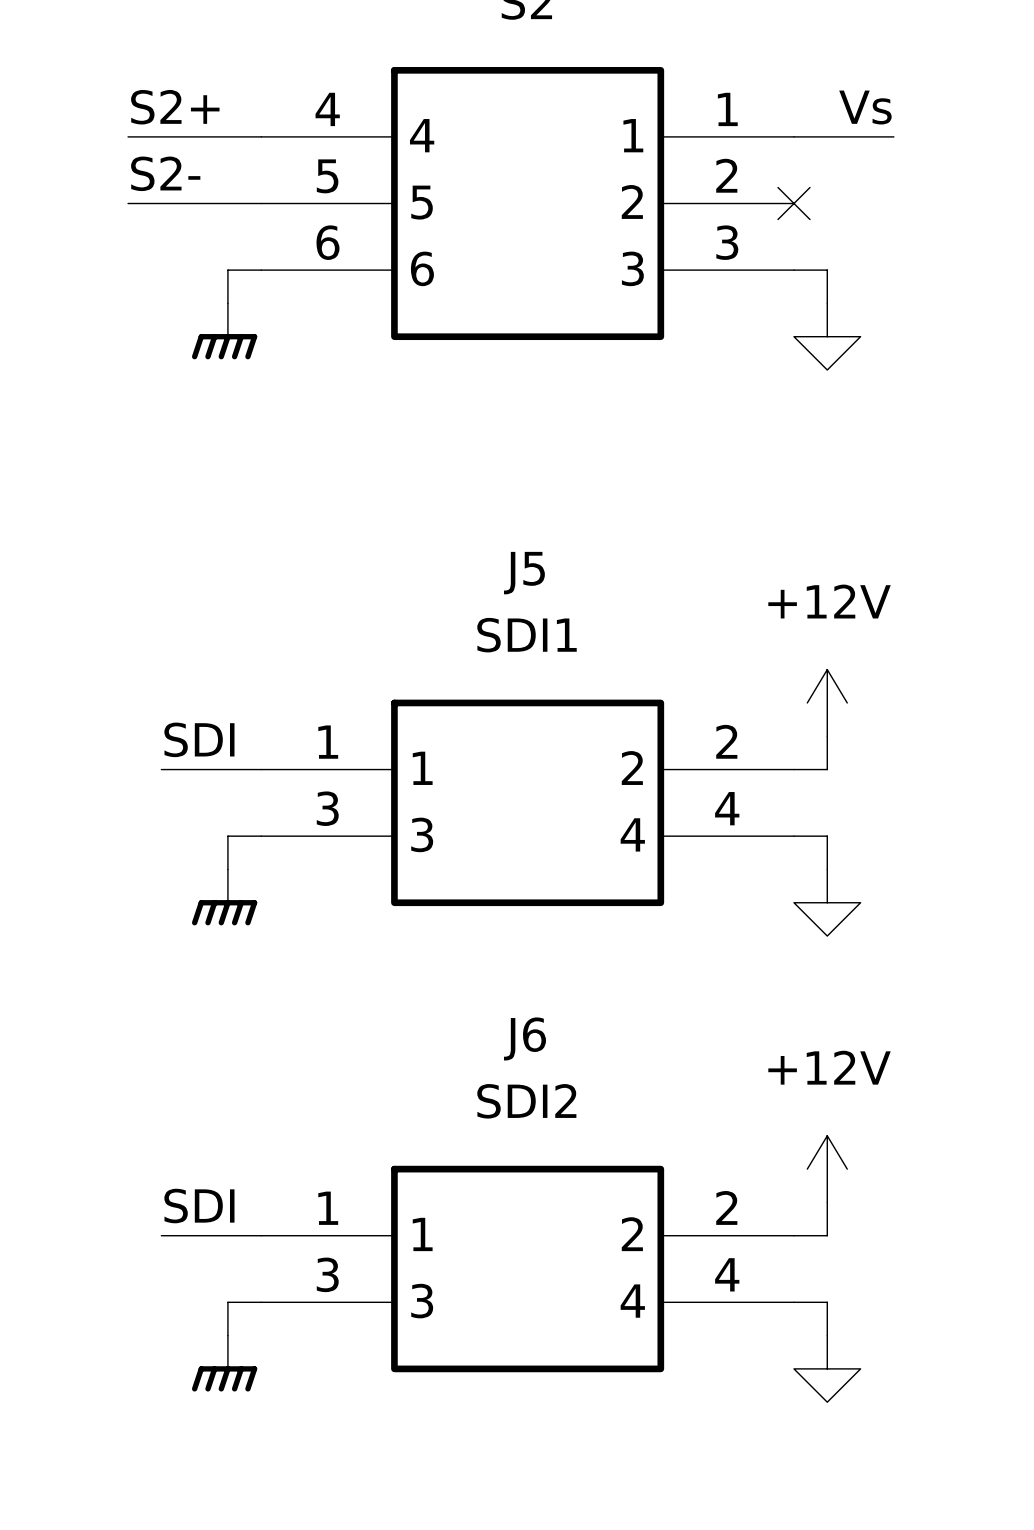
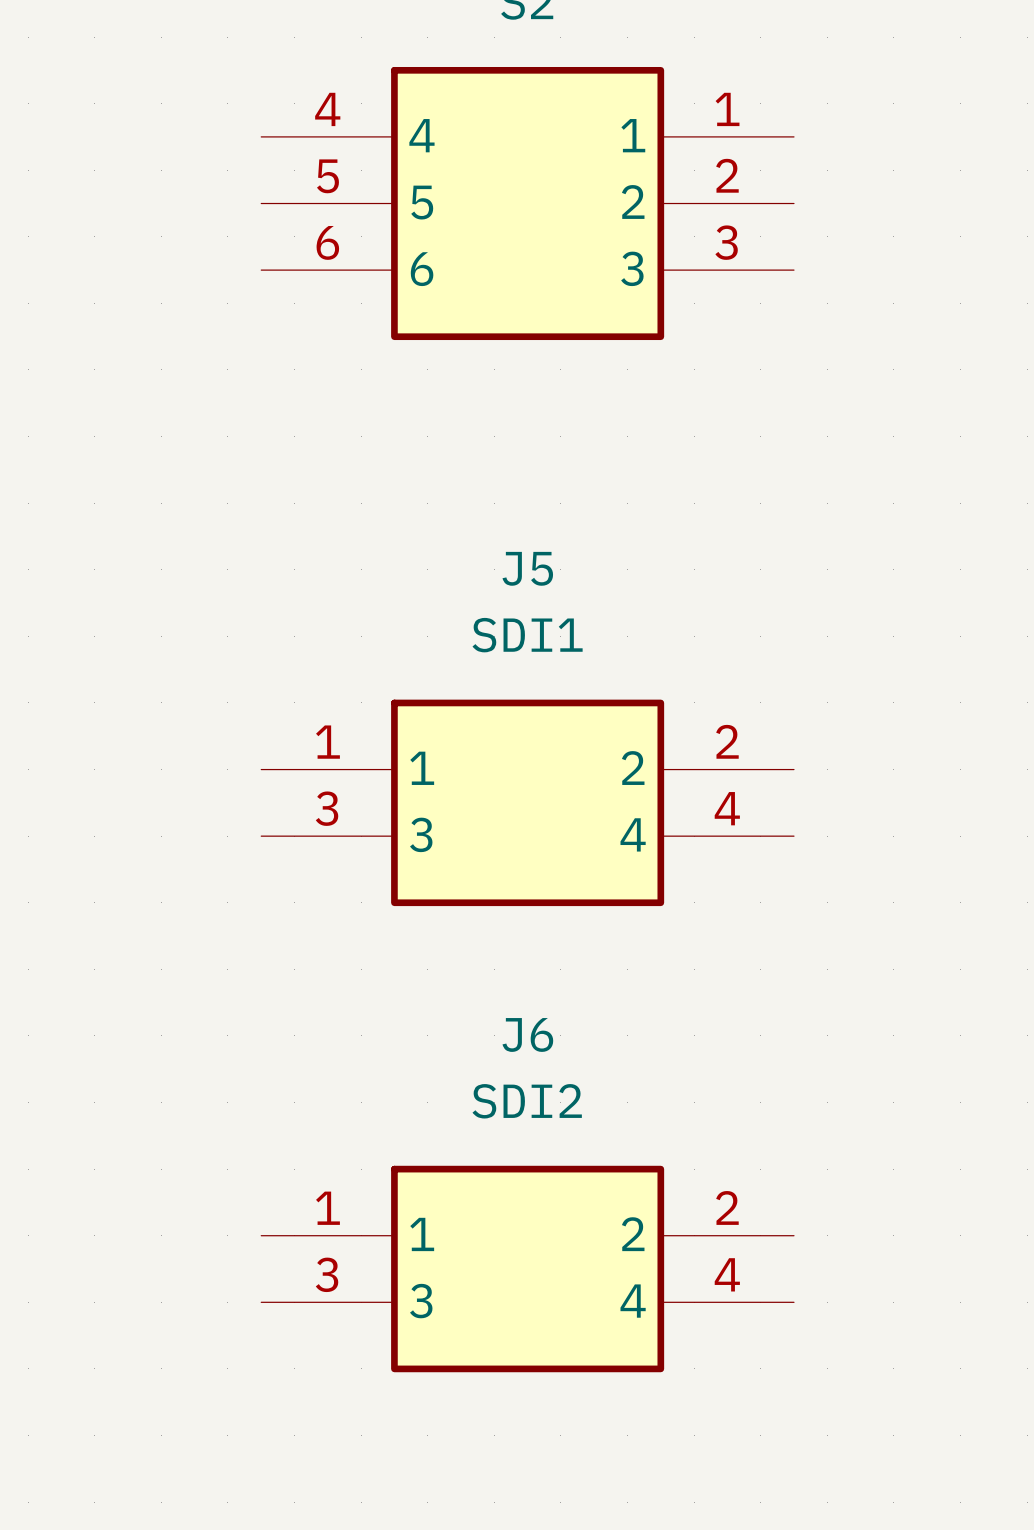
label: S2+ (175, 107) -> none
label: Vs (865, 107) -> none
wire: (128, 136) (261, 136) -> none
wire: (793, 136) (893, 136) -> none
label: S2- (165, 173) -> none
wire: (128, 203) (261, 203) -> none
no-connect mark: (793, 203) -> none
wire: (261, 270) (227, 270) (227, 303) -> none
wire: (793, 270) (827, 270) (827, 303) -> none
power symbol: (224, 331) -> none
power symbol: (827, 336) -> none
power symbol: +12V (827, 702) -> none
wire: (827, 736) (827, 769) (793, 769) -> none
label: SDI (199, 739) -> none
wire: (161, 769) (261, 769) -> none
wire: (261, 836) (227, 836) (227, 869) -> none
wire: (793, 836) (827, 836) (827, 869) -> none
power symbol: (224, 897) -> none
power symbol: (827, 902) -> none
power symbol: +12V (827, 1169) -> none
wire: (827, 1202) (827, 1235) (793, 1235) -> none
label: SDI (199, 1206) -> none
wire: (161, 1235) (261, 1235) -> none
wire: (261, 1302) (227, 1302) (227, 1335) -> none
wire: (793, 1302) (827, 1302) (827, 1335) -> none
power symbol: (224, 1363) -> none
power symbol: (827, 1368) -> none

